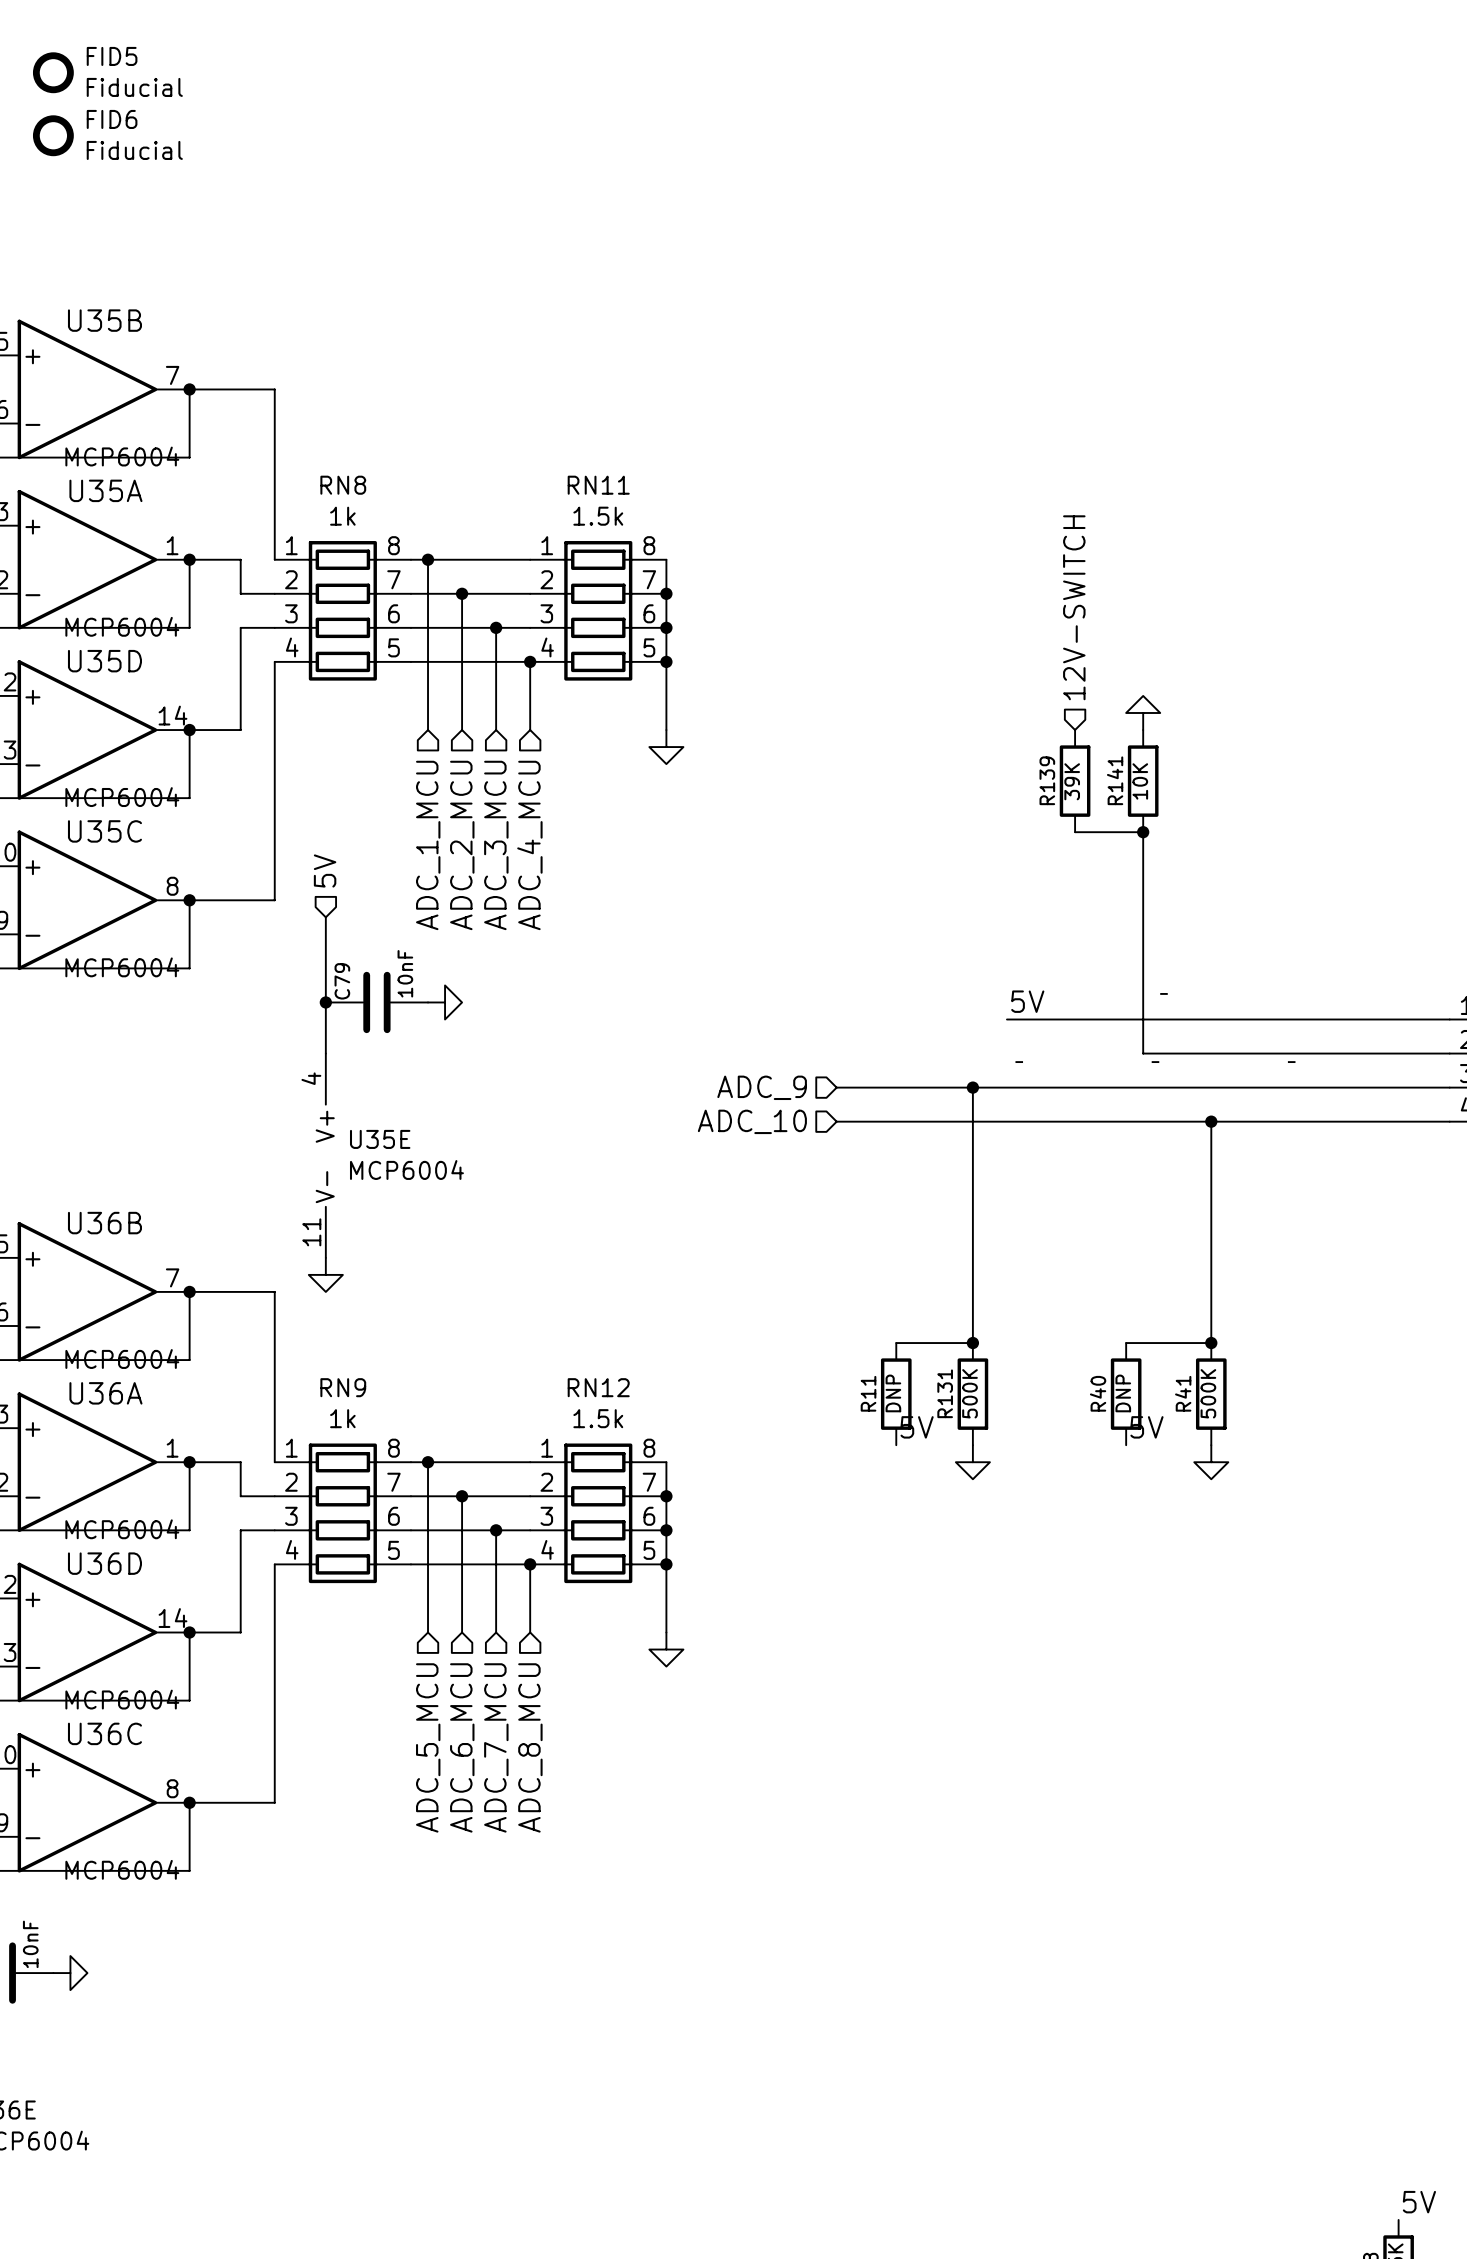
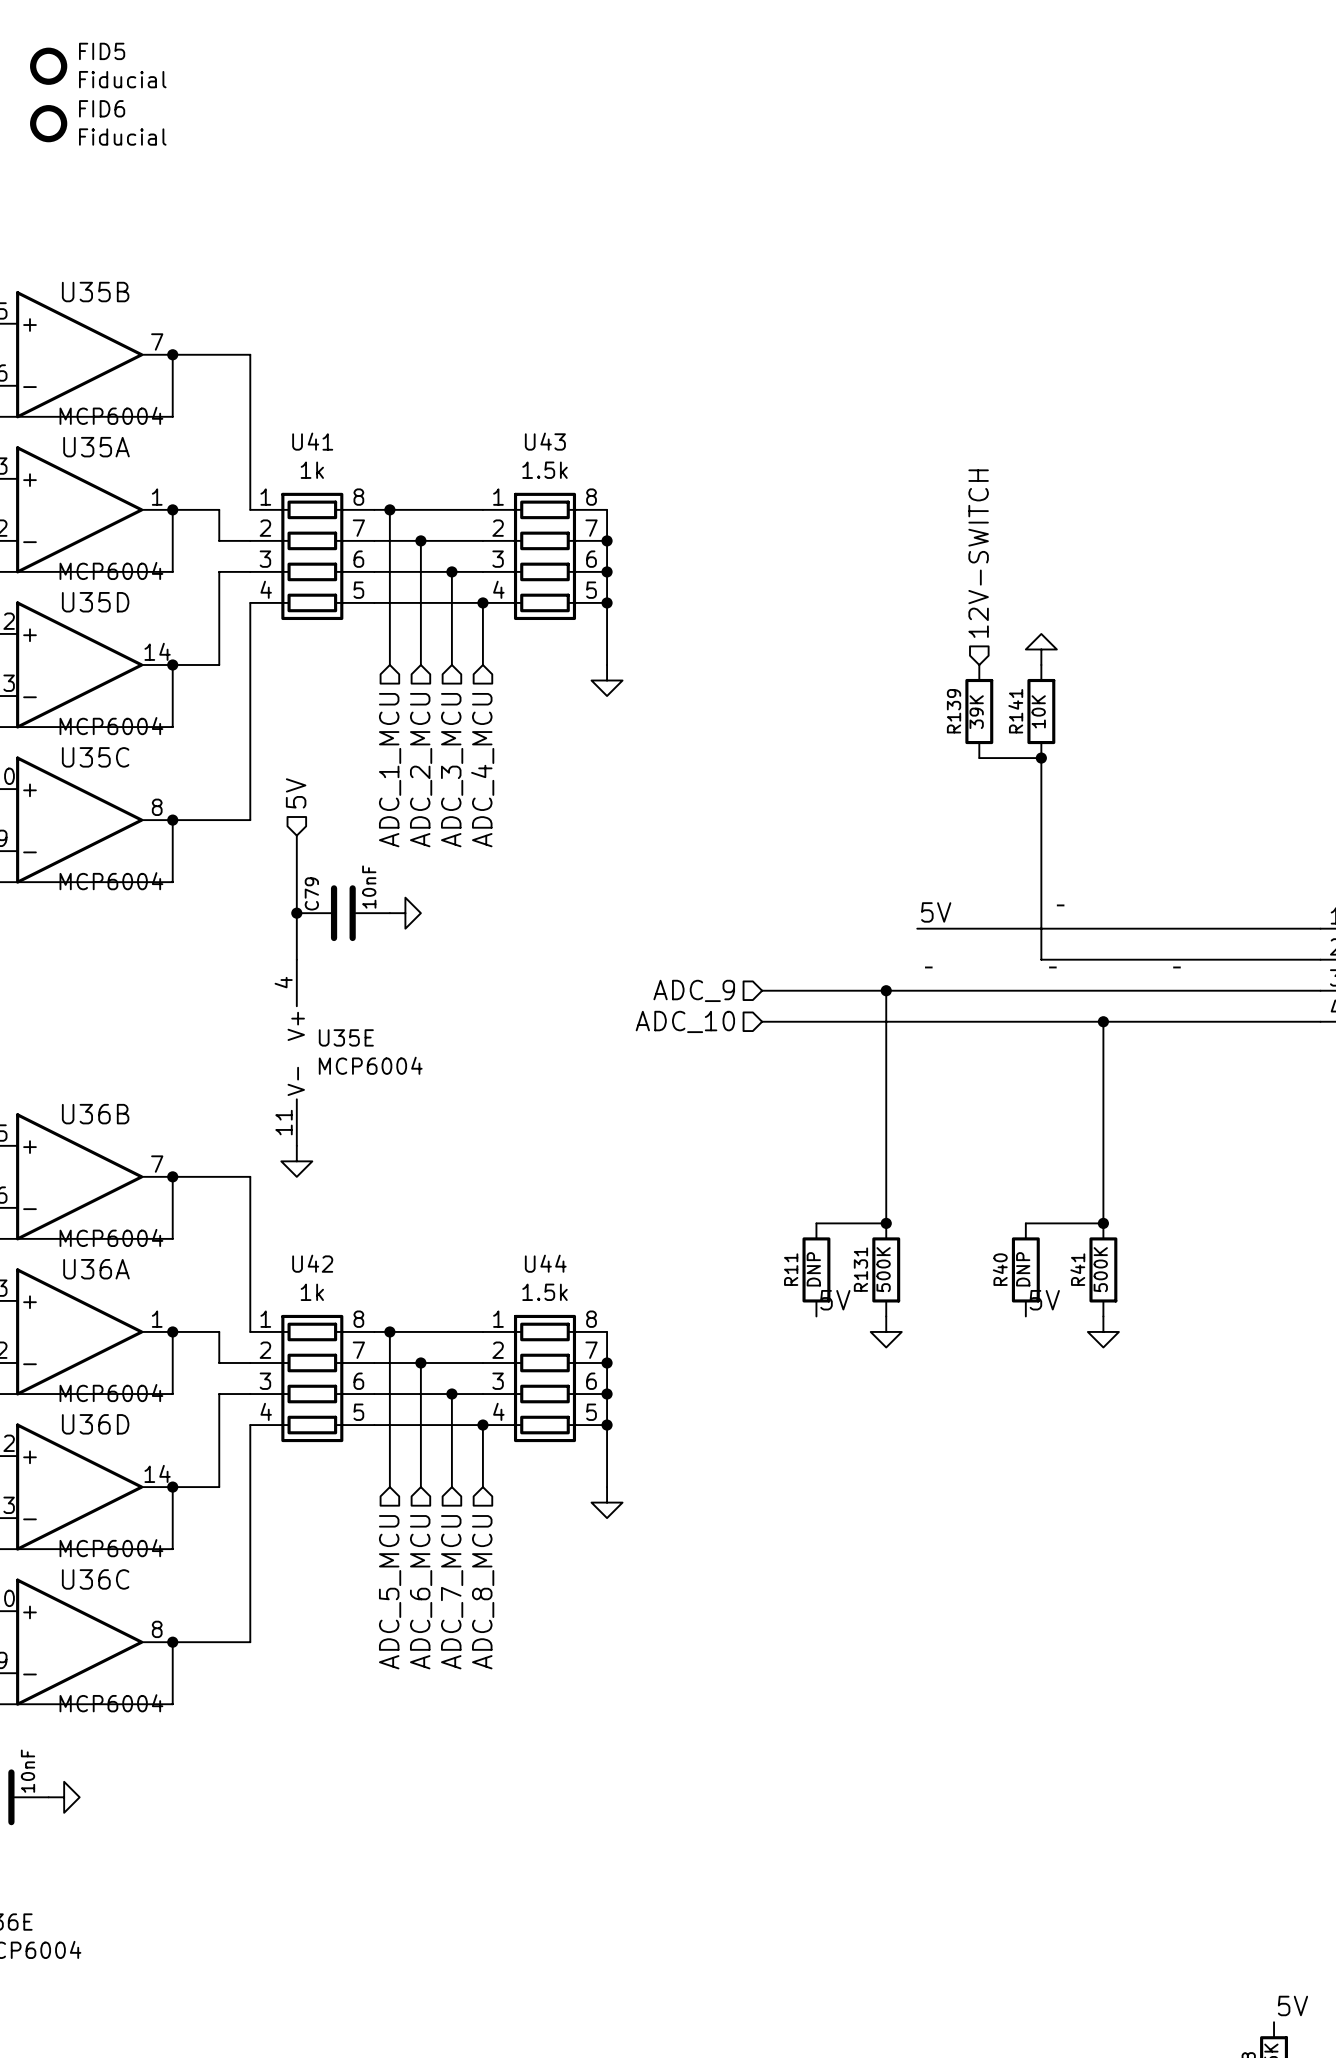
RN8 name: RN8 (343, 485) -> U41 (312, 441)
RN11 name: RN11 (598, 485) -> U43 (545, 441)
RN9 name: RN9 (343, 1387) -> U42 (312, 1263)
RN12 name: RN12 (598, 1387) -> U44 (545, 1263)

